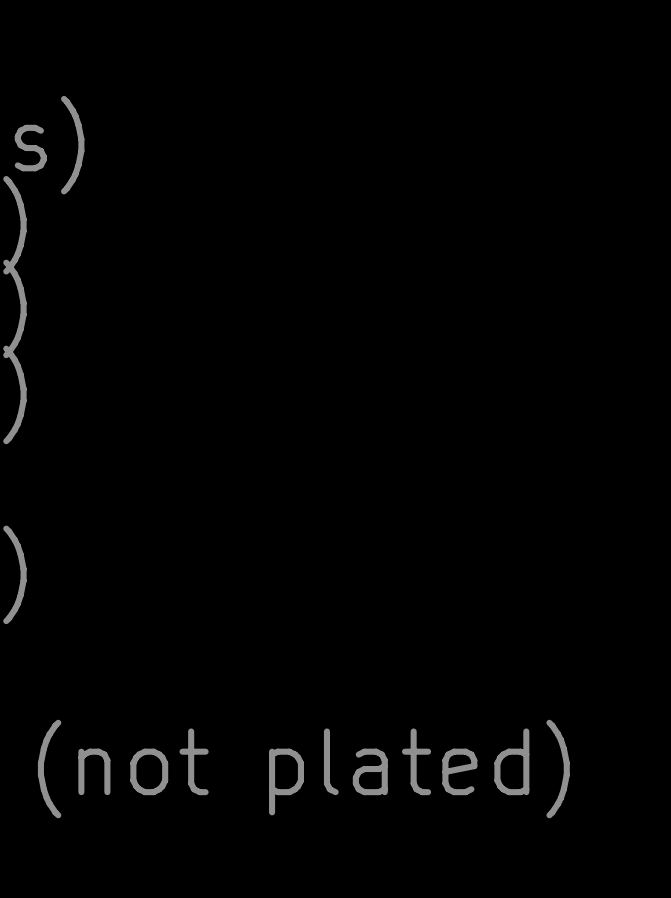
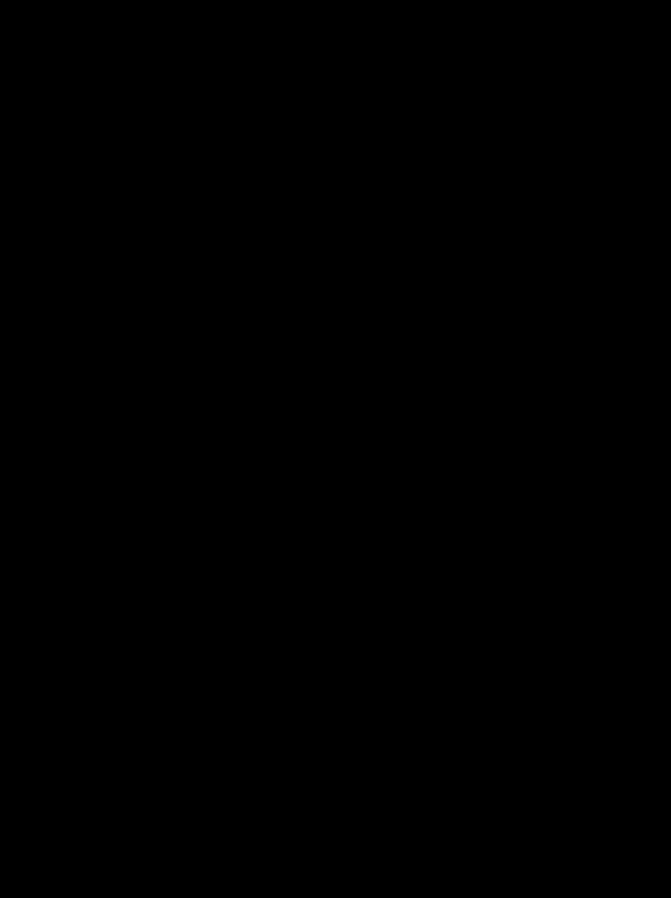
line: (64, 98) (75, 116) (81, 139) (81, 150) (75, 174) (64, 191) -> none
line: (40, 130) (35, 127) (26, 127) (20, 130) (17, 136) (20, 145) (40, 150) (43, 156) (40, 165) (35, 168) (23, 168) (17, 165) -> none
line: (6, 179) (17, 196) (23, 219) (20, 245) (14, 259) (6, 271) -> none
line: (6, 262) (17, 280) (23, 303) (20, 329) (14, 343) (6, 355) -> none
line: (6, 348) (17, 366) (23, 389) (20, 415) (14, 429) (6, 441) -> none
line: (6, 528) (17, 545) (23, 569) (20, 595) (14, 609) (6, 621) -> none
line: (58, 722) (46, 740) (40, 763) (40, 774) (46, 797) (58, 815) -> none
line: (549, 722) (560, 740) (566, 763) (566, 774) (560, 797) (549, 815) -> none
line: (191, 731) (191, 783) (194, 789) (205, 792) -> none
line: (326, 731) (326, 783) (329, 789) (335, 792) -> none
line: (413, 731) (413, 783) (416, 789) (428, 792) -> none
line: (526, 731) (526, 792) -> none
line: (81, 751) (81, 792) -> none
line: (144, 751) (153, 751) (159, 754) (165, 763) (165, 780) (159, 789) (153, 792) (144, 792) (139, 789) (133, 780) (133, 763) (136, 757) (144, 751) -> none
line: (182, 751) (205, 751) -> none
line: (272, 751) (272, 812) -> none
line: (404, 751) (428, 751) -> none
line: (272, 754) (277, 751) (289, 751) (298, 757) (300, 763) (300, 780) (295, 789) (289, 792) (277, 792) (272, 789) -> none
line: (358, 754) (364, 751) (376, 751) (381, 754) (384, 760) (384, 792) -> none
line: (526, 754) (520, 751) (508, 751) (500, 757) (497, 763) (497, 780) (503, 789) (508, 792) (520, 792) (526, 789) -> none
line: (81, 757) (90, 751) (98, 751) (104, 754) (107, 760) (107, 792) -> none
line: (384, 766) (378, 769) (364, 769) (358, 771) (355, 777) (358, 789) (364, 792) (378, 792) (384, 789) -> none
line: (445, 771) (474, 766) (471, 754) (465, 751) (454, 751) (448, 754) (445, 760) (445, 783) (448, 789) (454, 792) (465, 792) (471, 789) -> none

